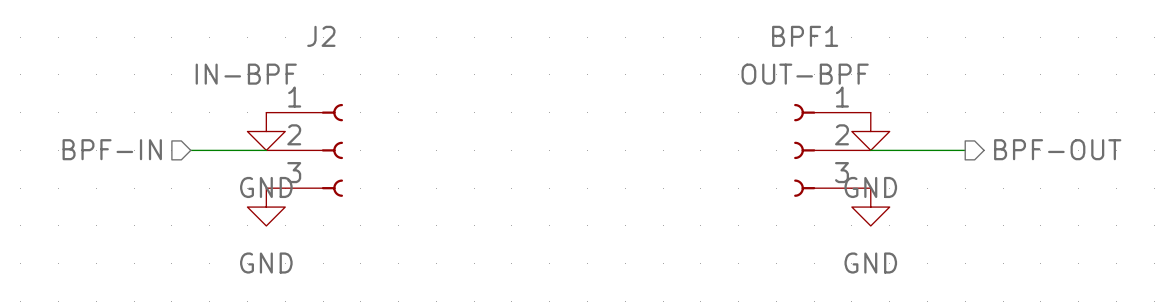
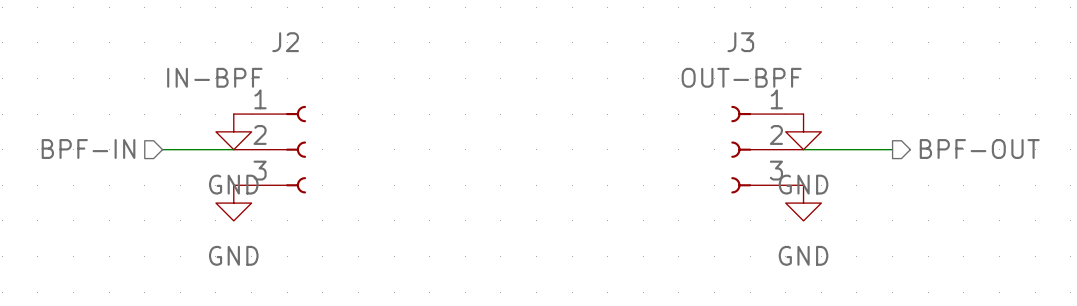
BPF1 name: BPF1 (805, 36) -> J3 (740, 42)

